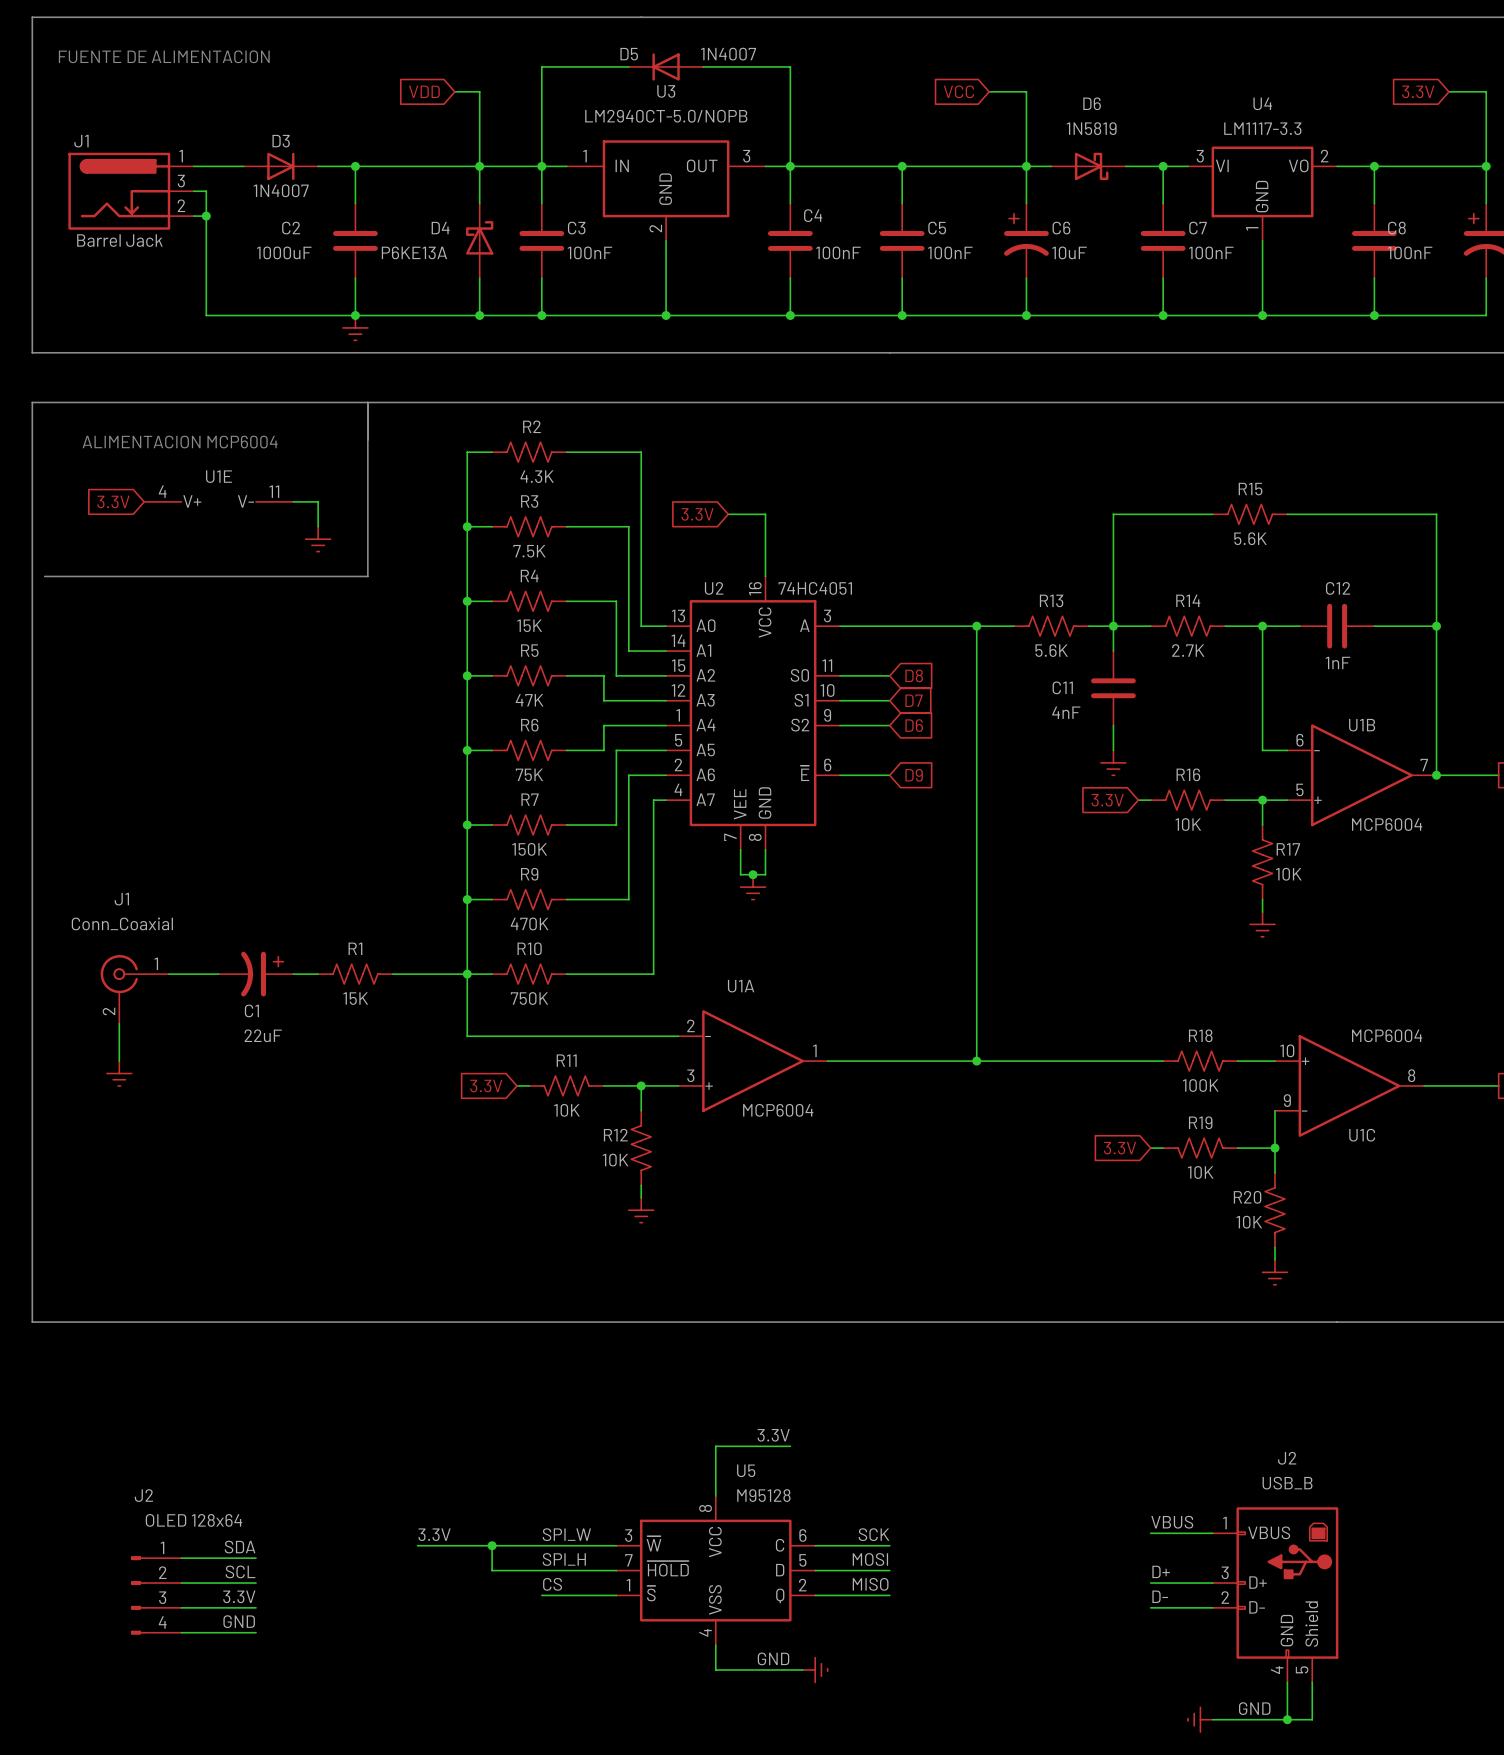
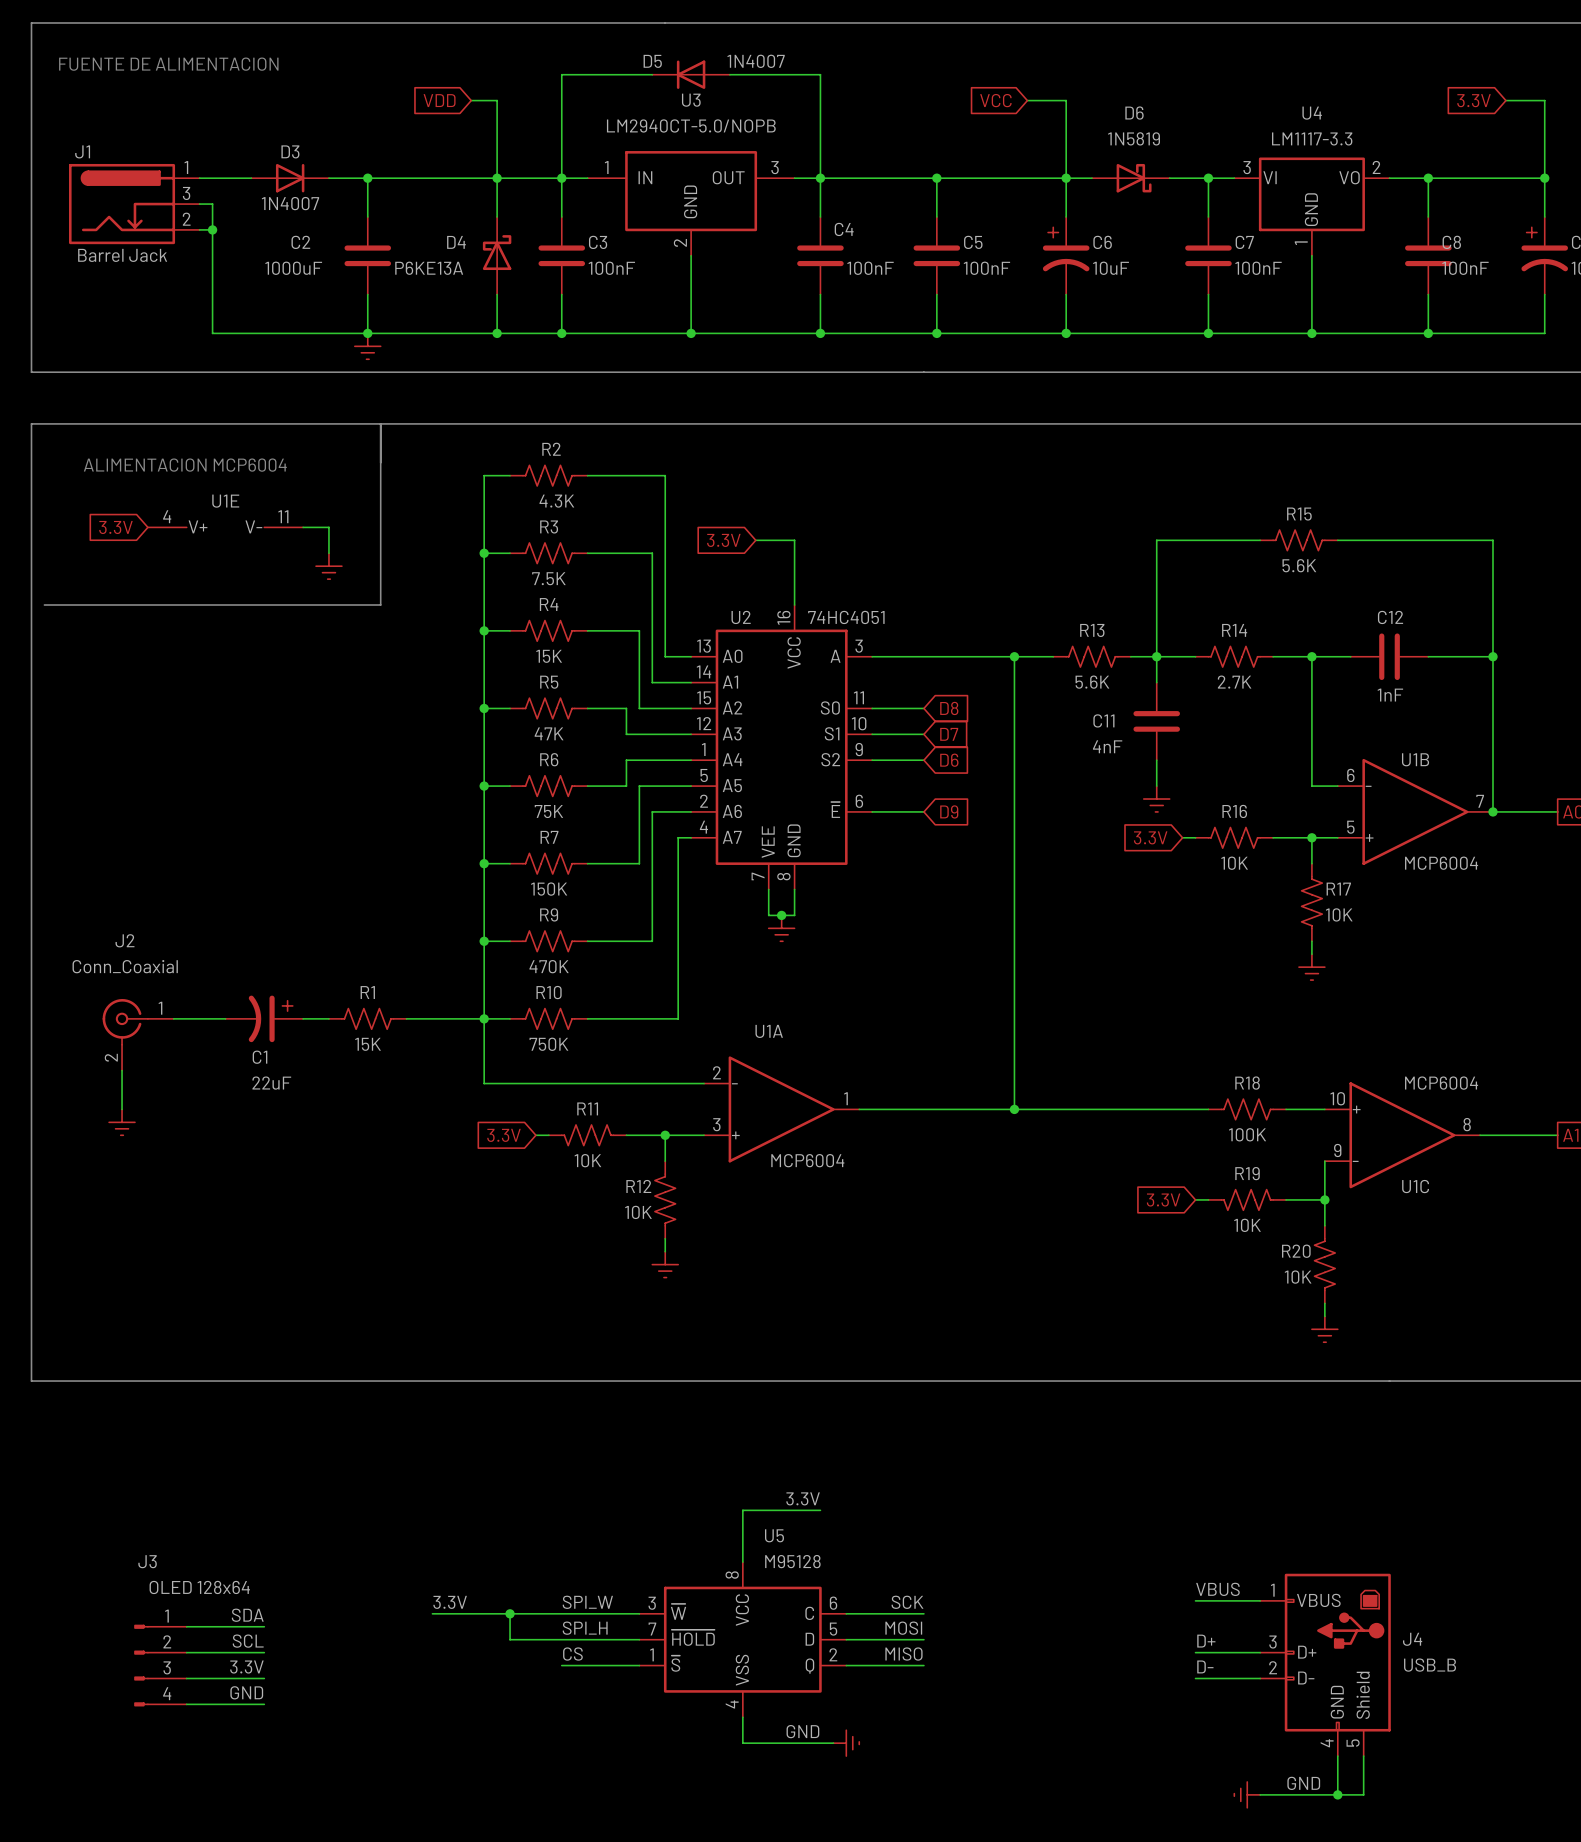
J1 name: J1 (121, 899) -> J2 (124, 940)
J2 name: J2 (1287, 1458) -> J4 (1412, 1639)
J2 value position: USB_B (1287, 1483) -> USB_B (1430, 1665)
J2 name: J2 (143, 1495) -> J3 (147, 1561)

